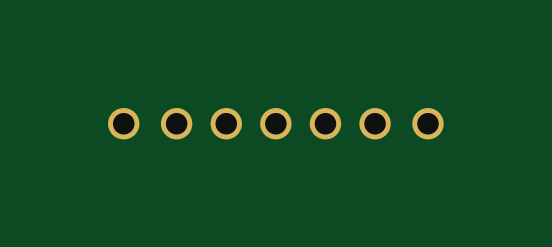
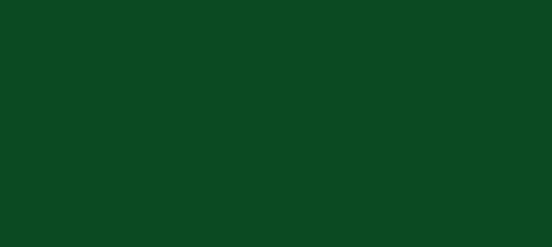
part: (123, 123) -> none
part: (176, 123) -> none
part: (226, 123) -> none
part: (275, 123) -> none
part: (325, 123) -> none
part: (375, 123) -> none
part: (427, 123) -> none

